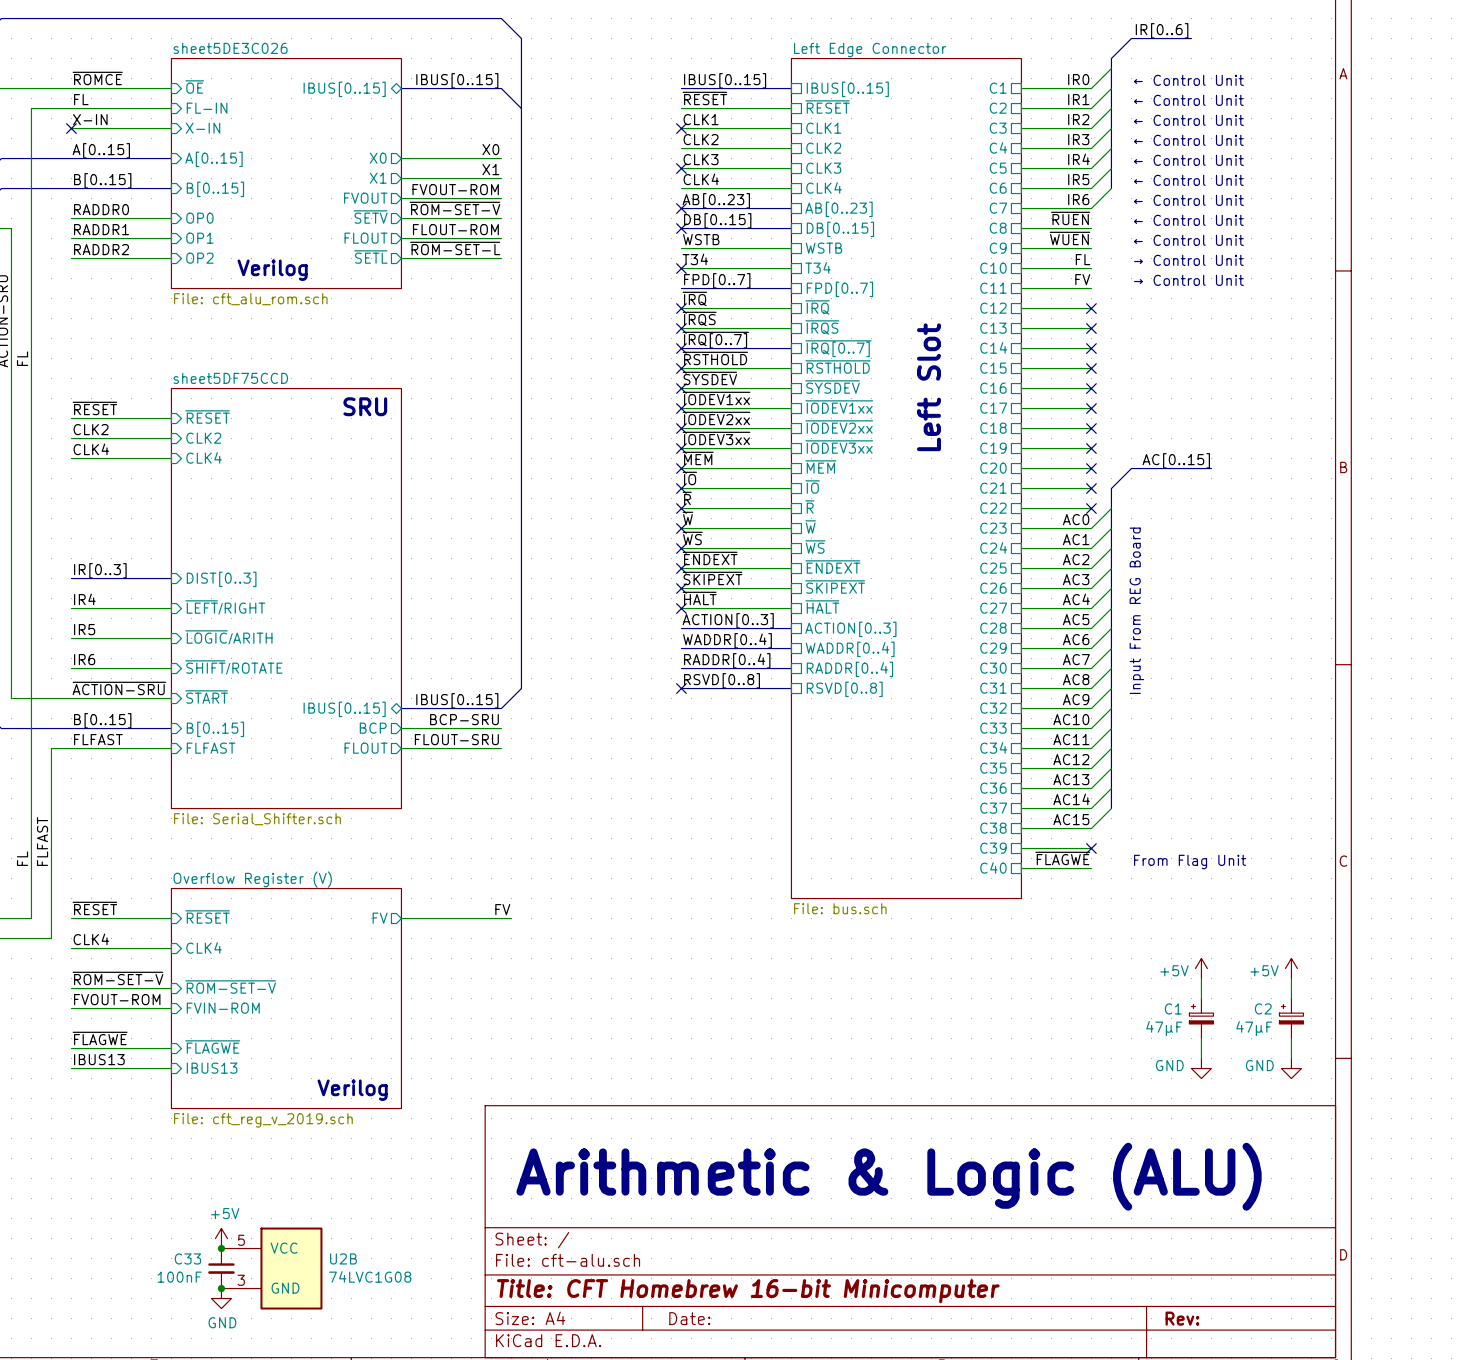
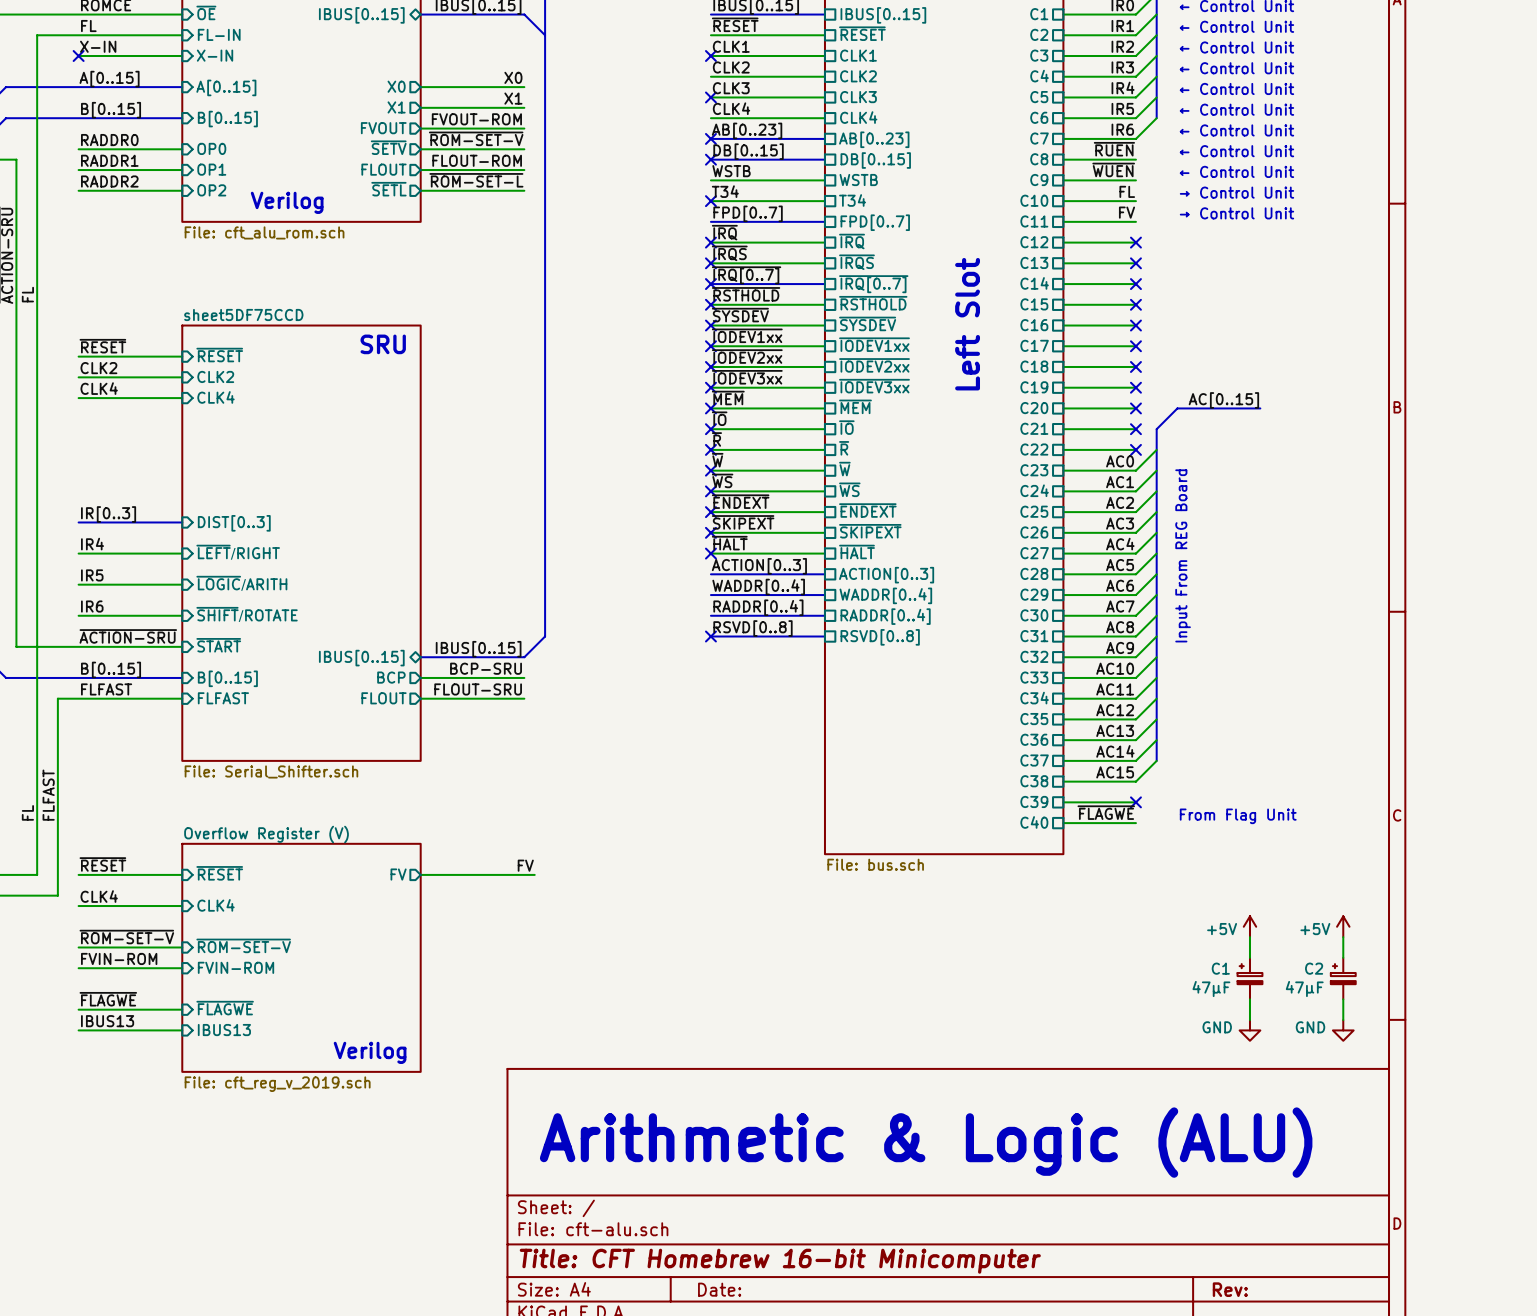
label: FVOUT-ROM (117, 999) -> FVIN-ROM (119, 958)
power symbol: +5V (221, 1238) -> none
junction: (221, 1248) -> none
C33: 100nF (221, 1268) -> none
U2B: 74LVC1G08 (271, 1268) -> none
junction: (221, 1288) -> none
power symbol: GND (221, 1298) -> none

